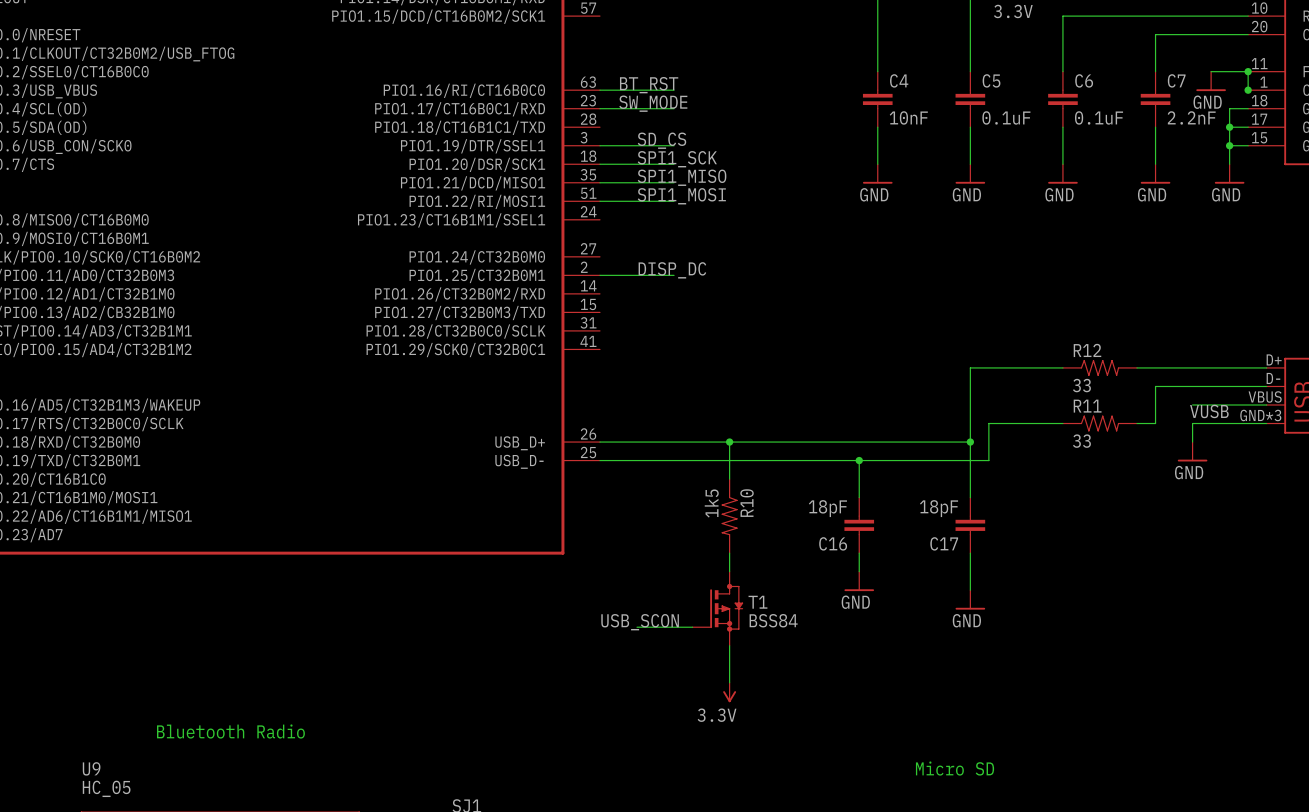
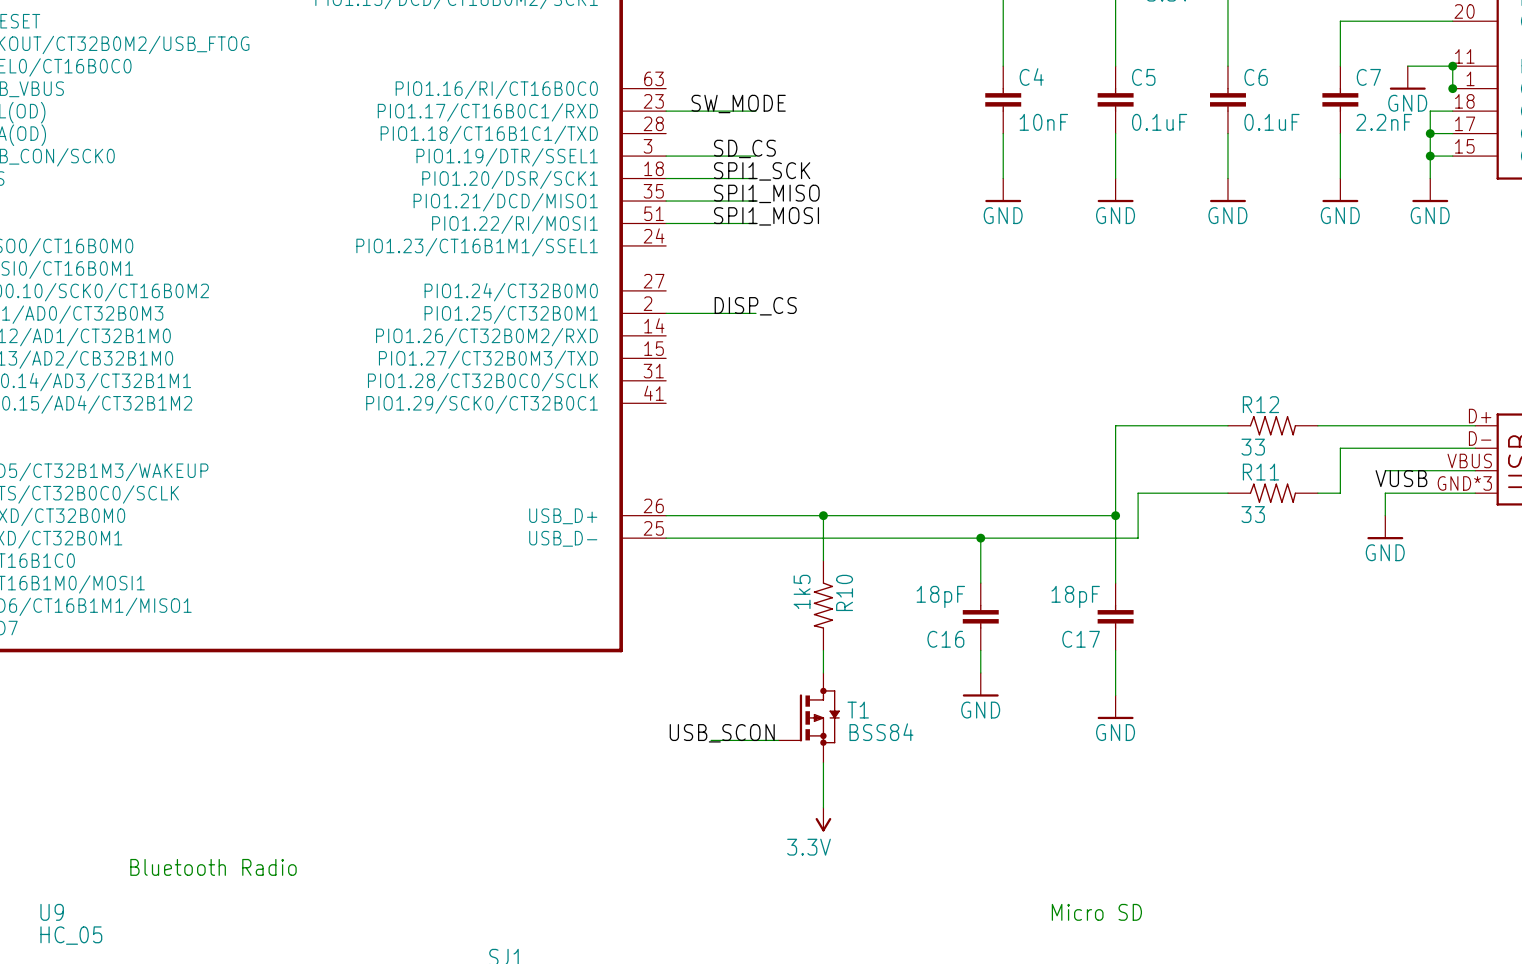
label: BT_RST (649, 85) -> none
wire: (599, 90) (674, 90) -> none
label: DISP_DC (672, 270) -> DISP_CS (755, 306)

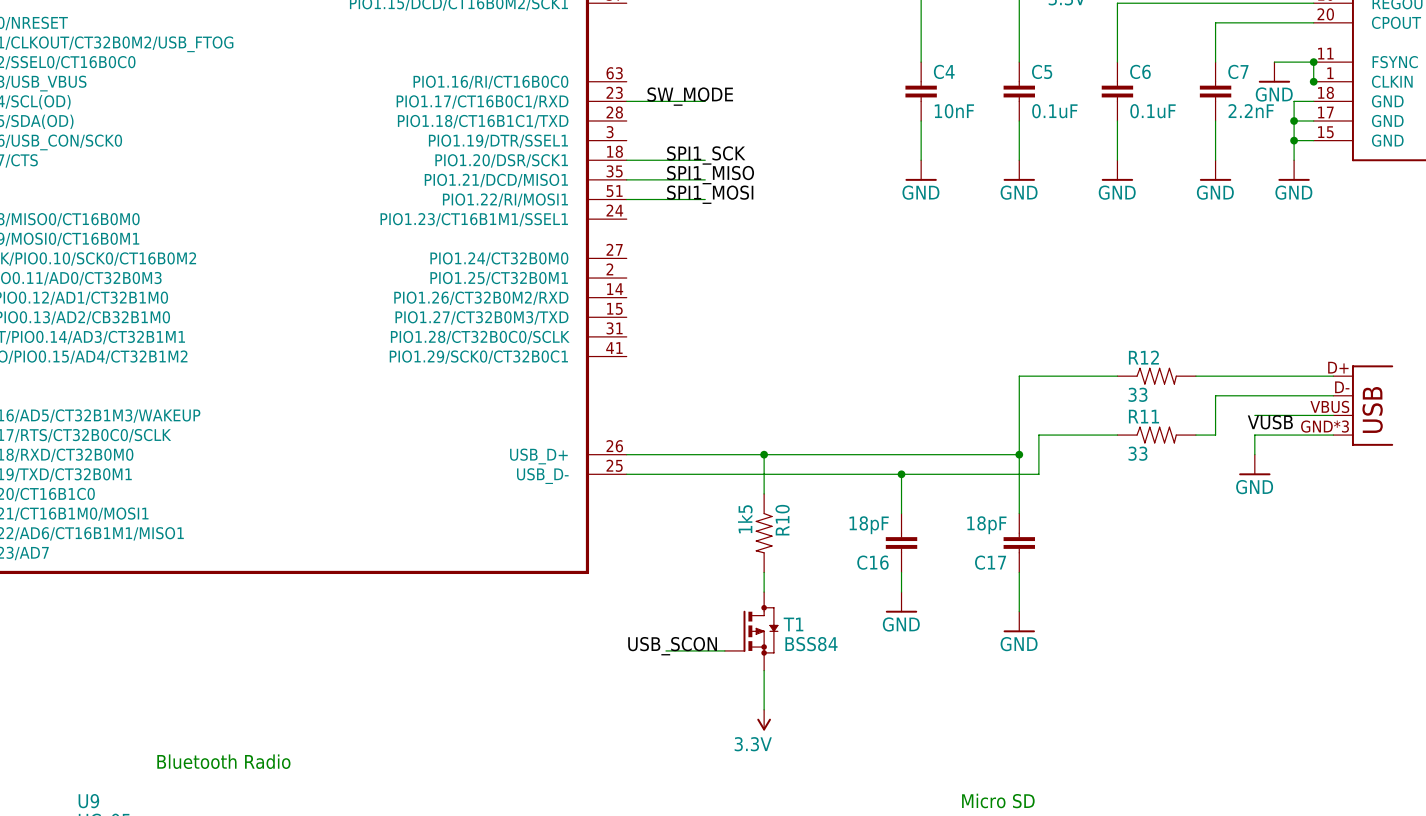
label: SD_CS (744, 148) -> none
wire: (666, 156) (756, 156) -> none
label: DISP_CS (755, 306) -> none
wire: (666, 313) (756, 313) -> none

